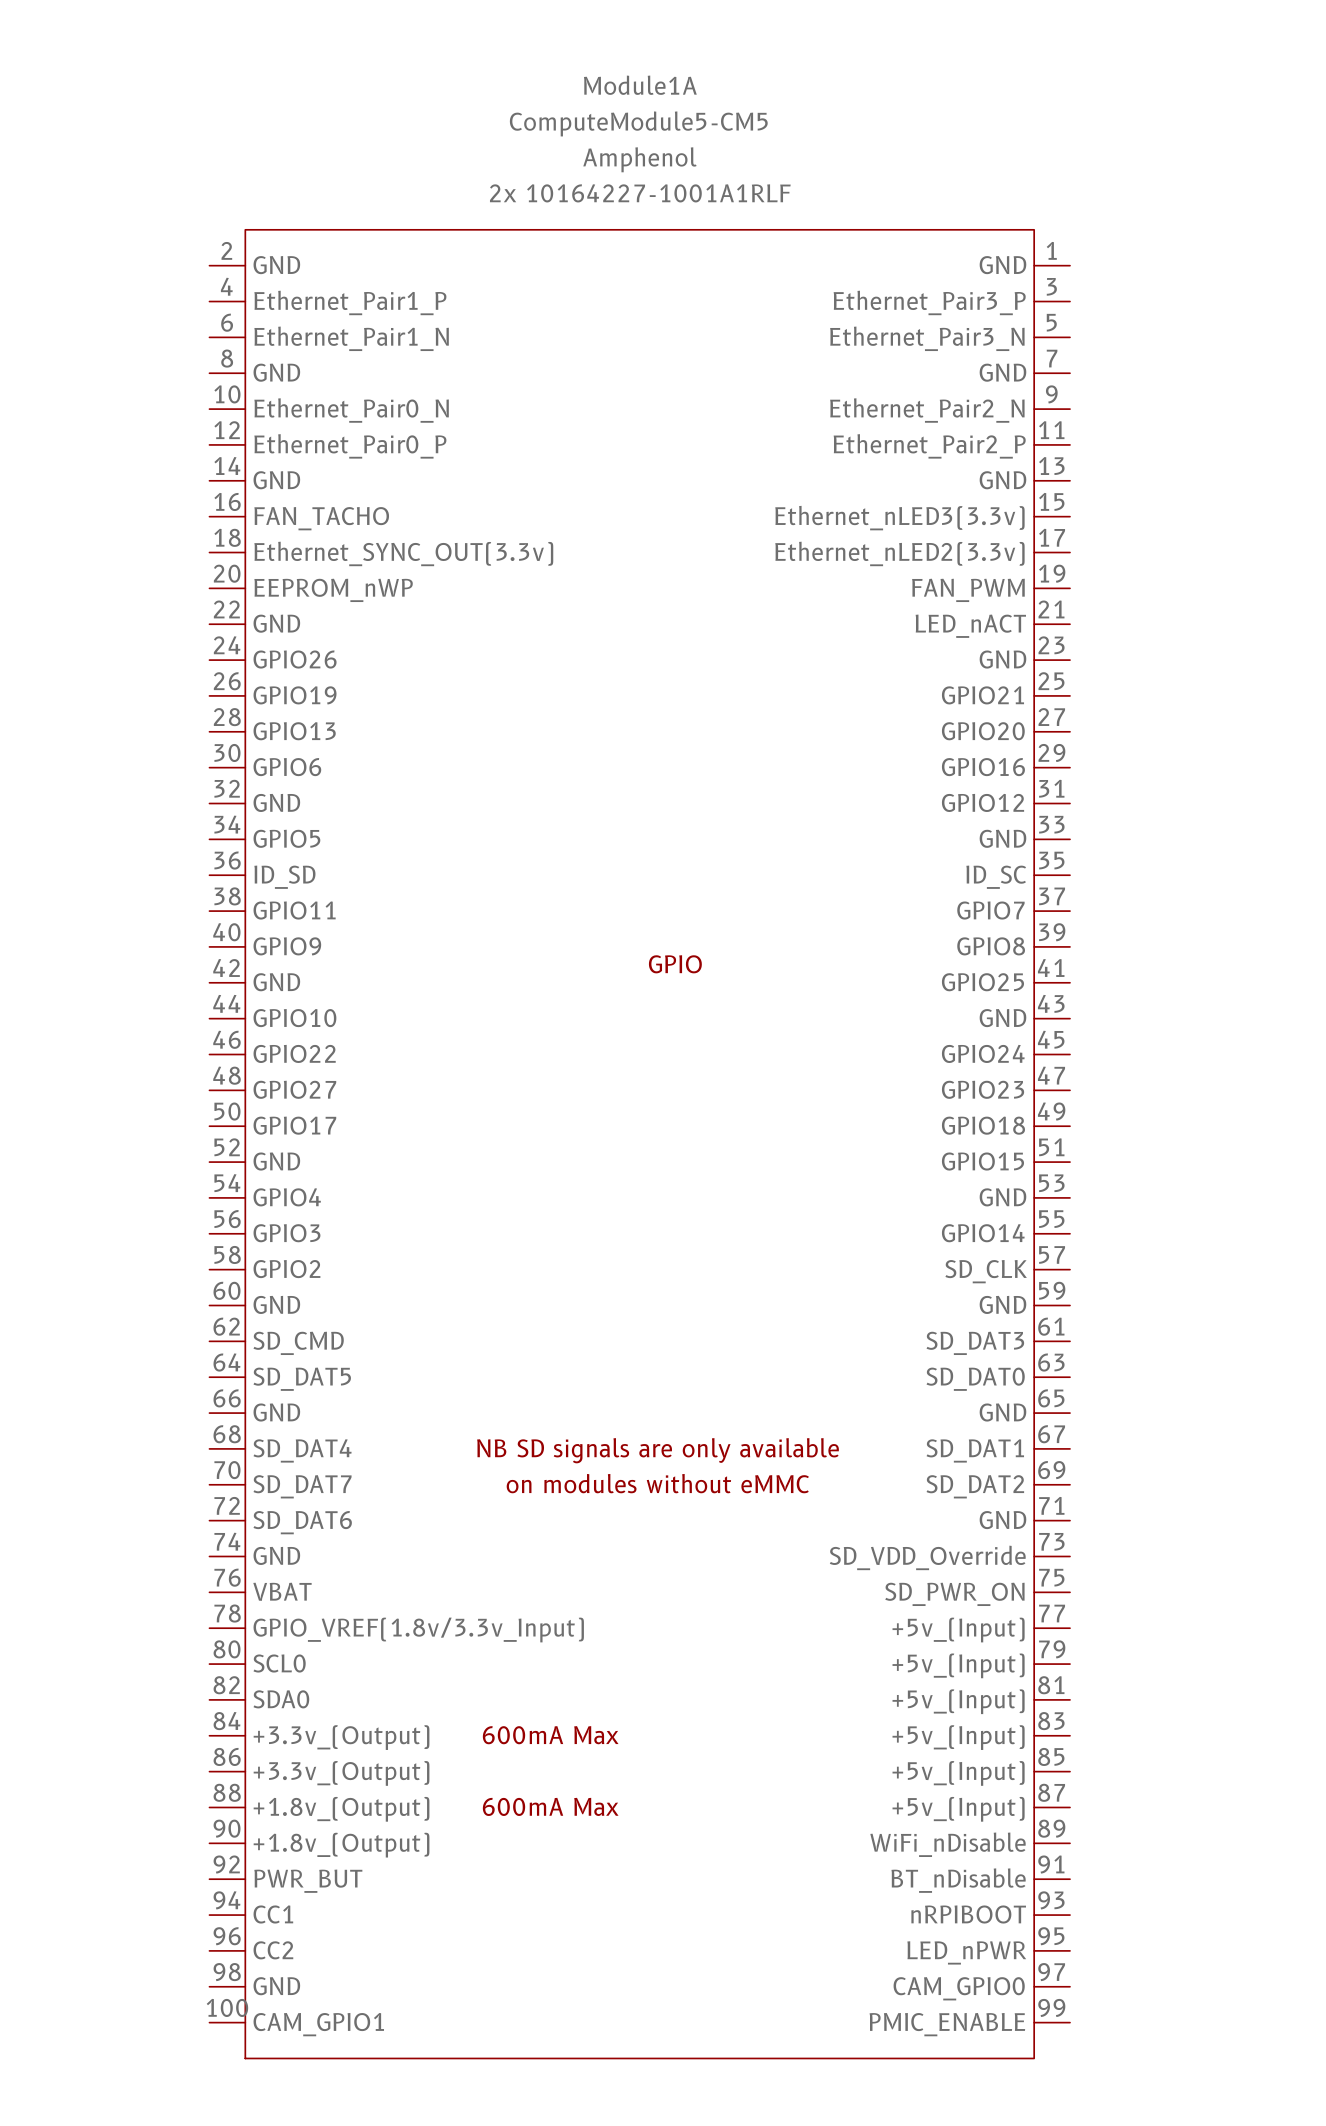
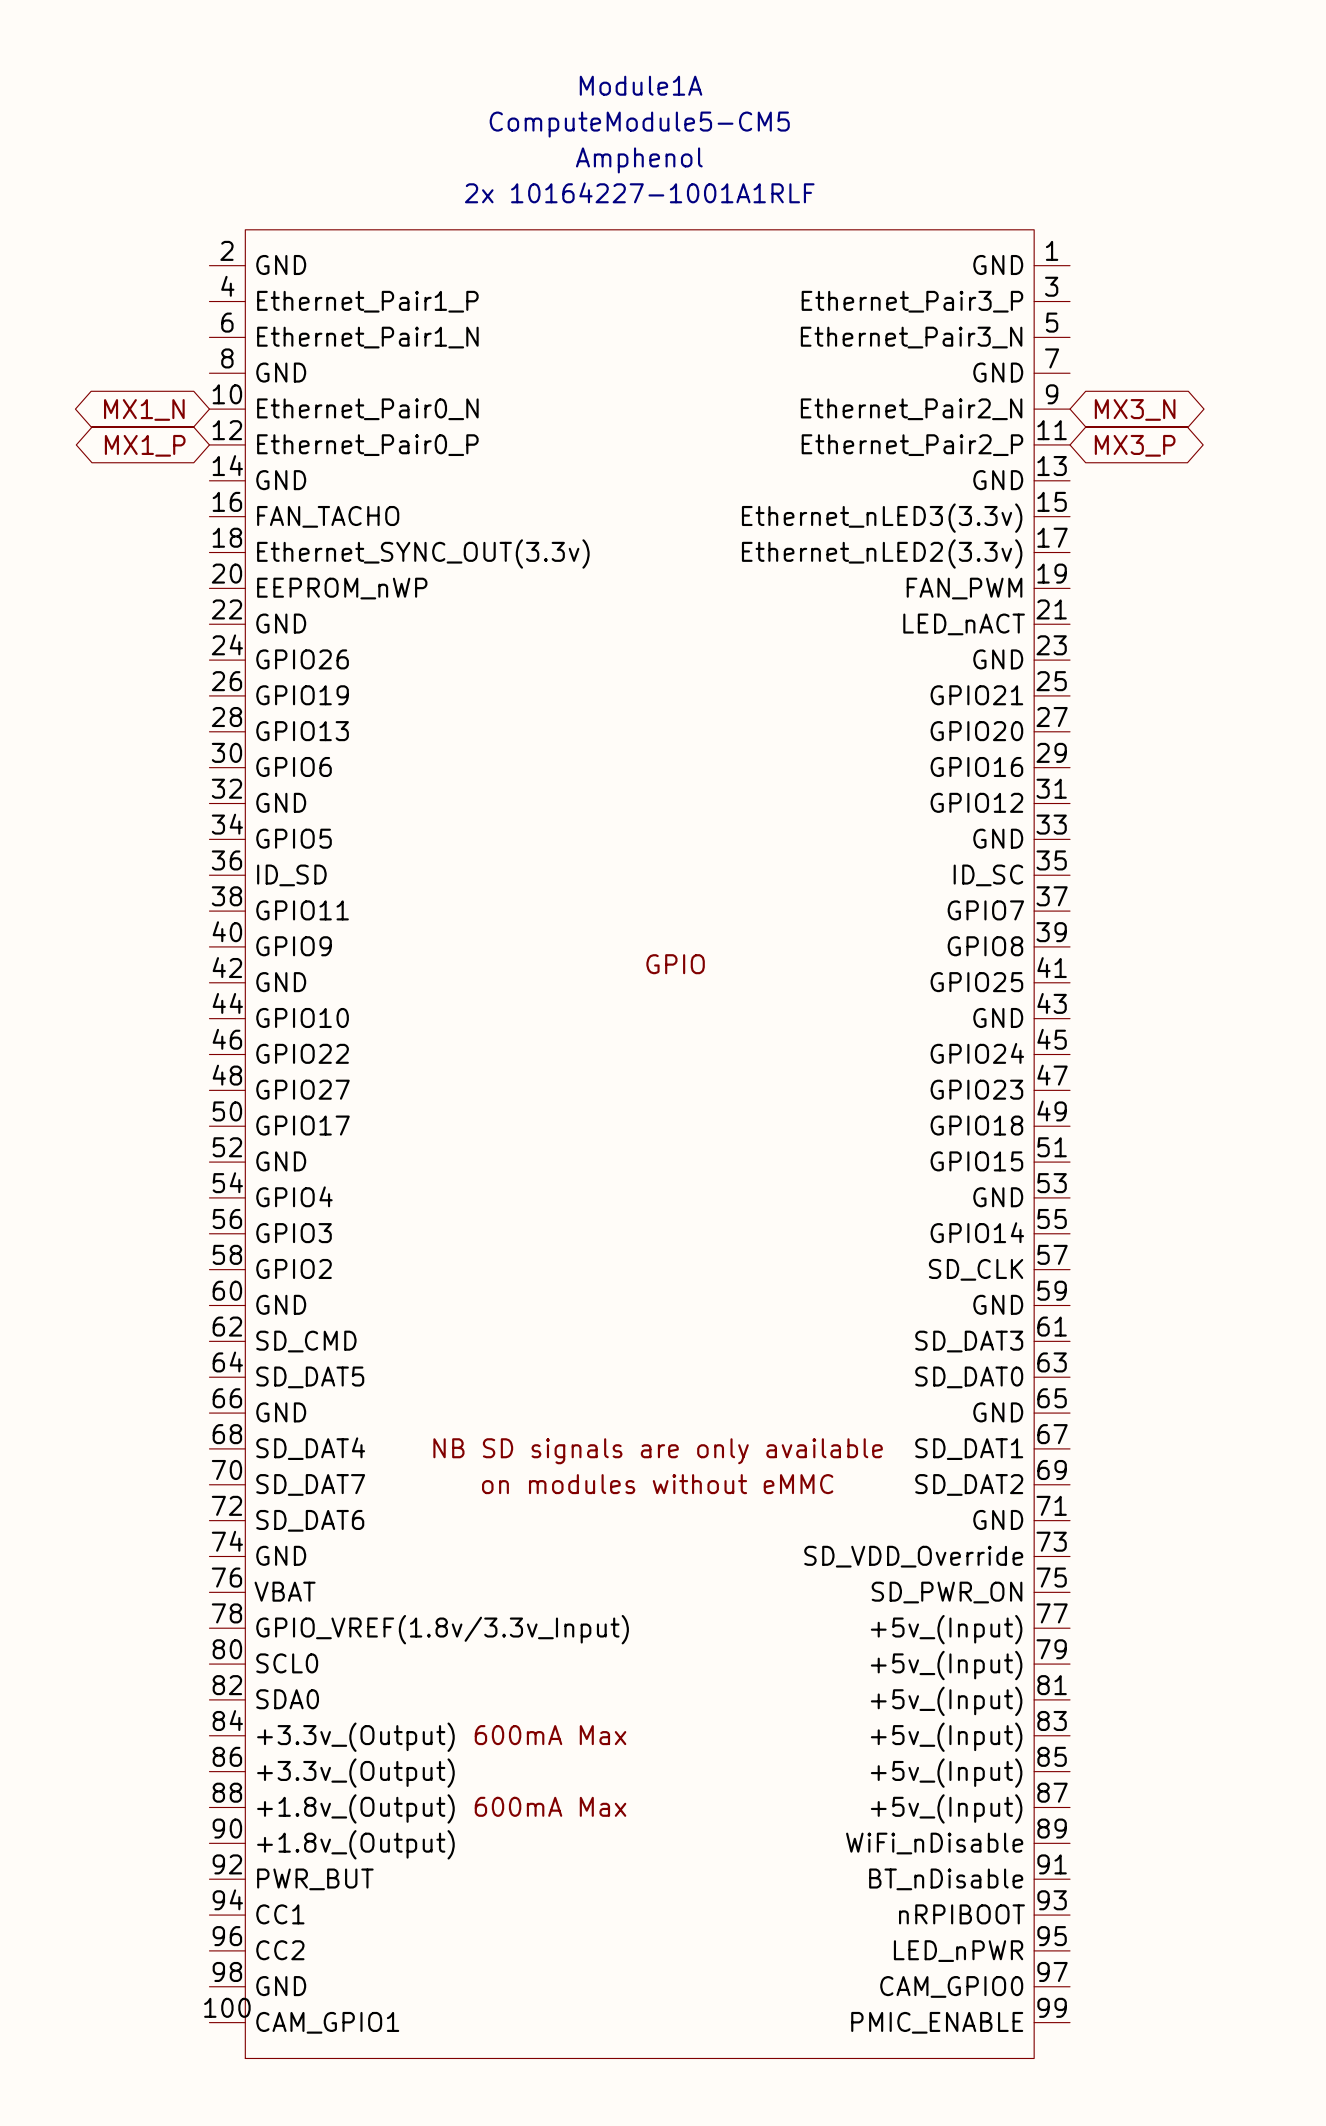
global label: none -> MX1_N (144, 409)
global label: none -> MX3_N (1135, 409)
global label: none -> MX1_P (145, 445)
global label: none -> MX3_P (1135, 445)

